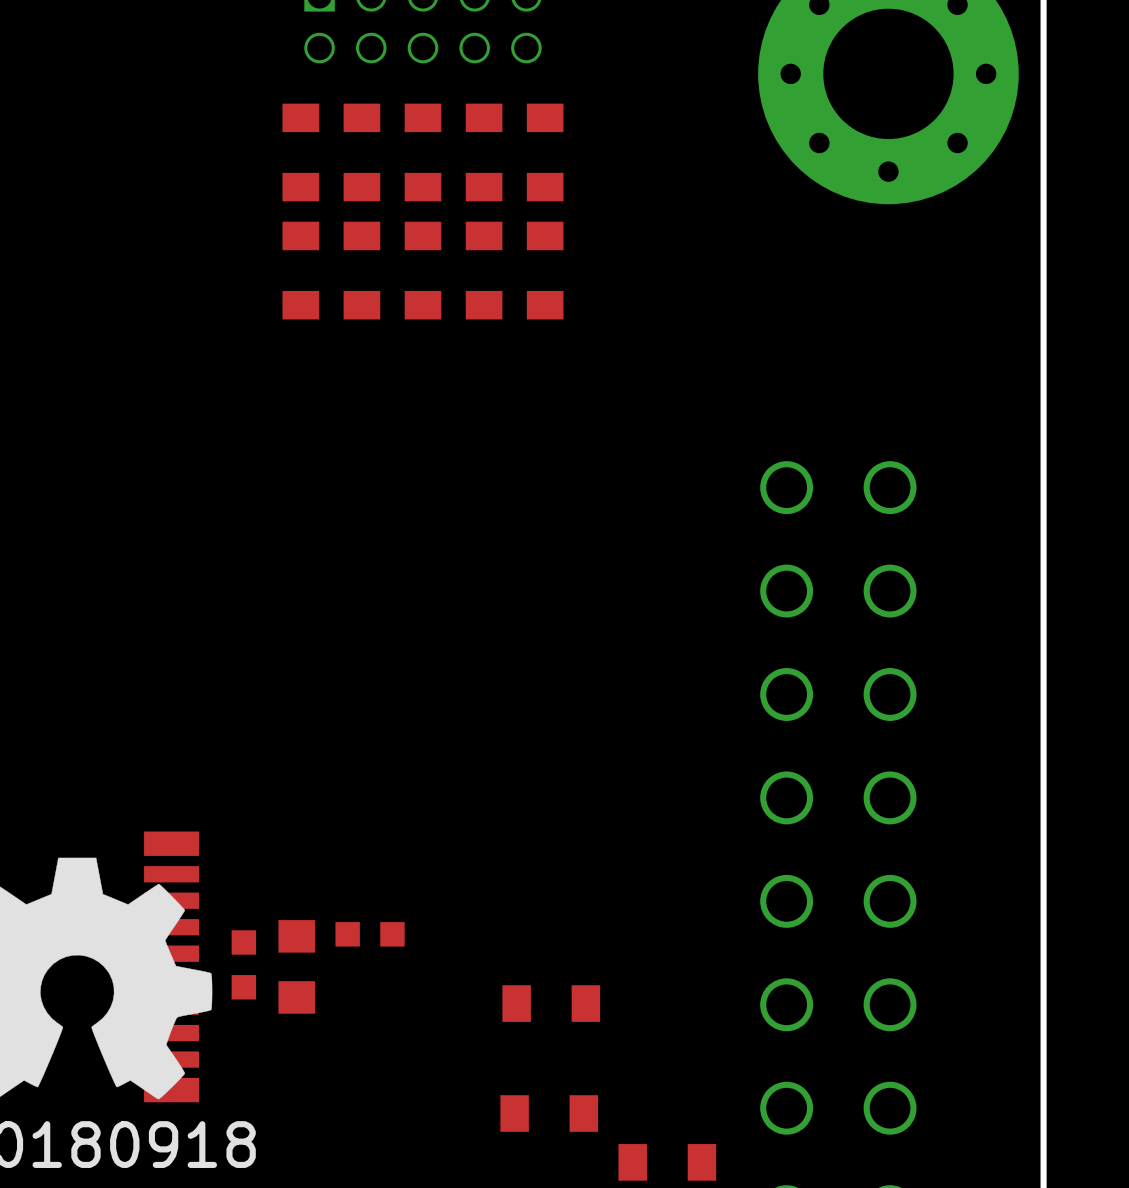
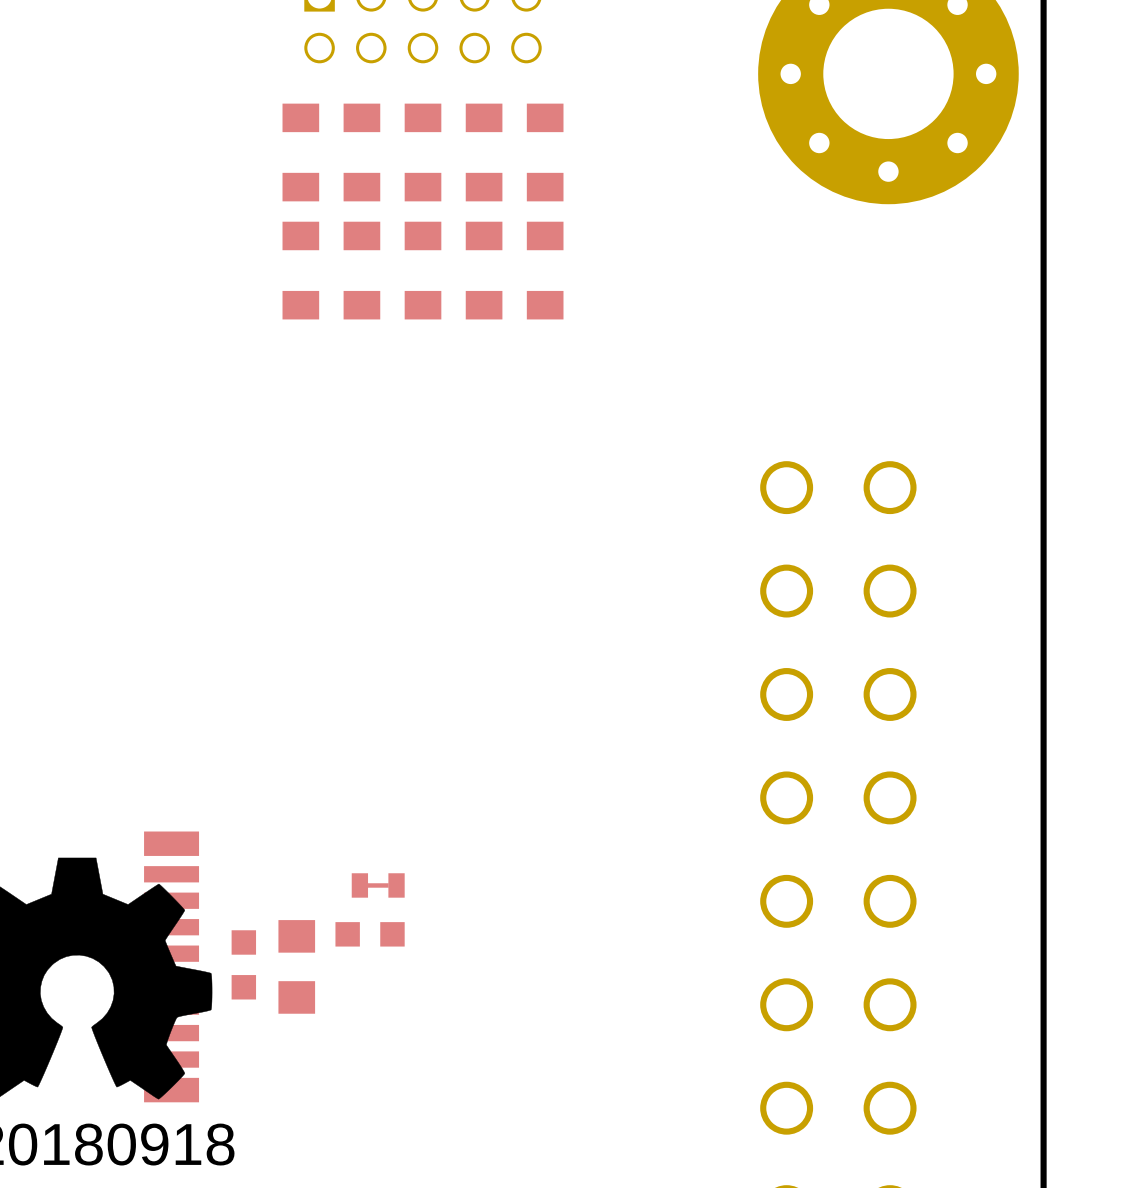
part: none -> (378, 885)
part: (551, 1003) -> none
part: (549, 1113) -> none
part: (667, 1162) -> none

